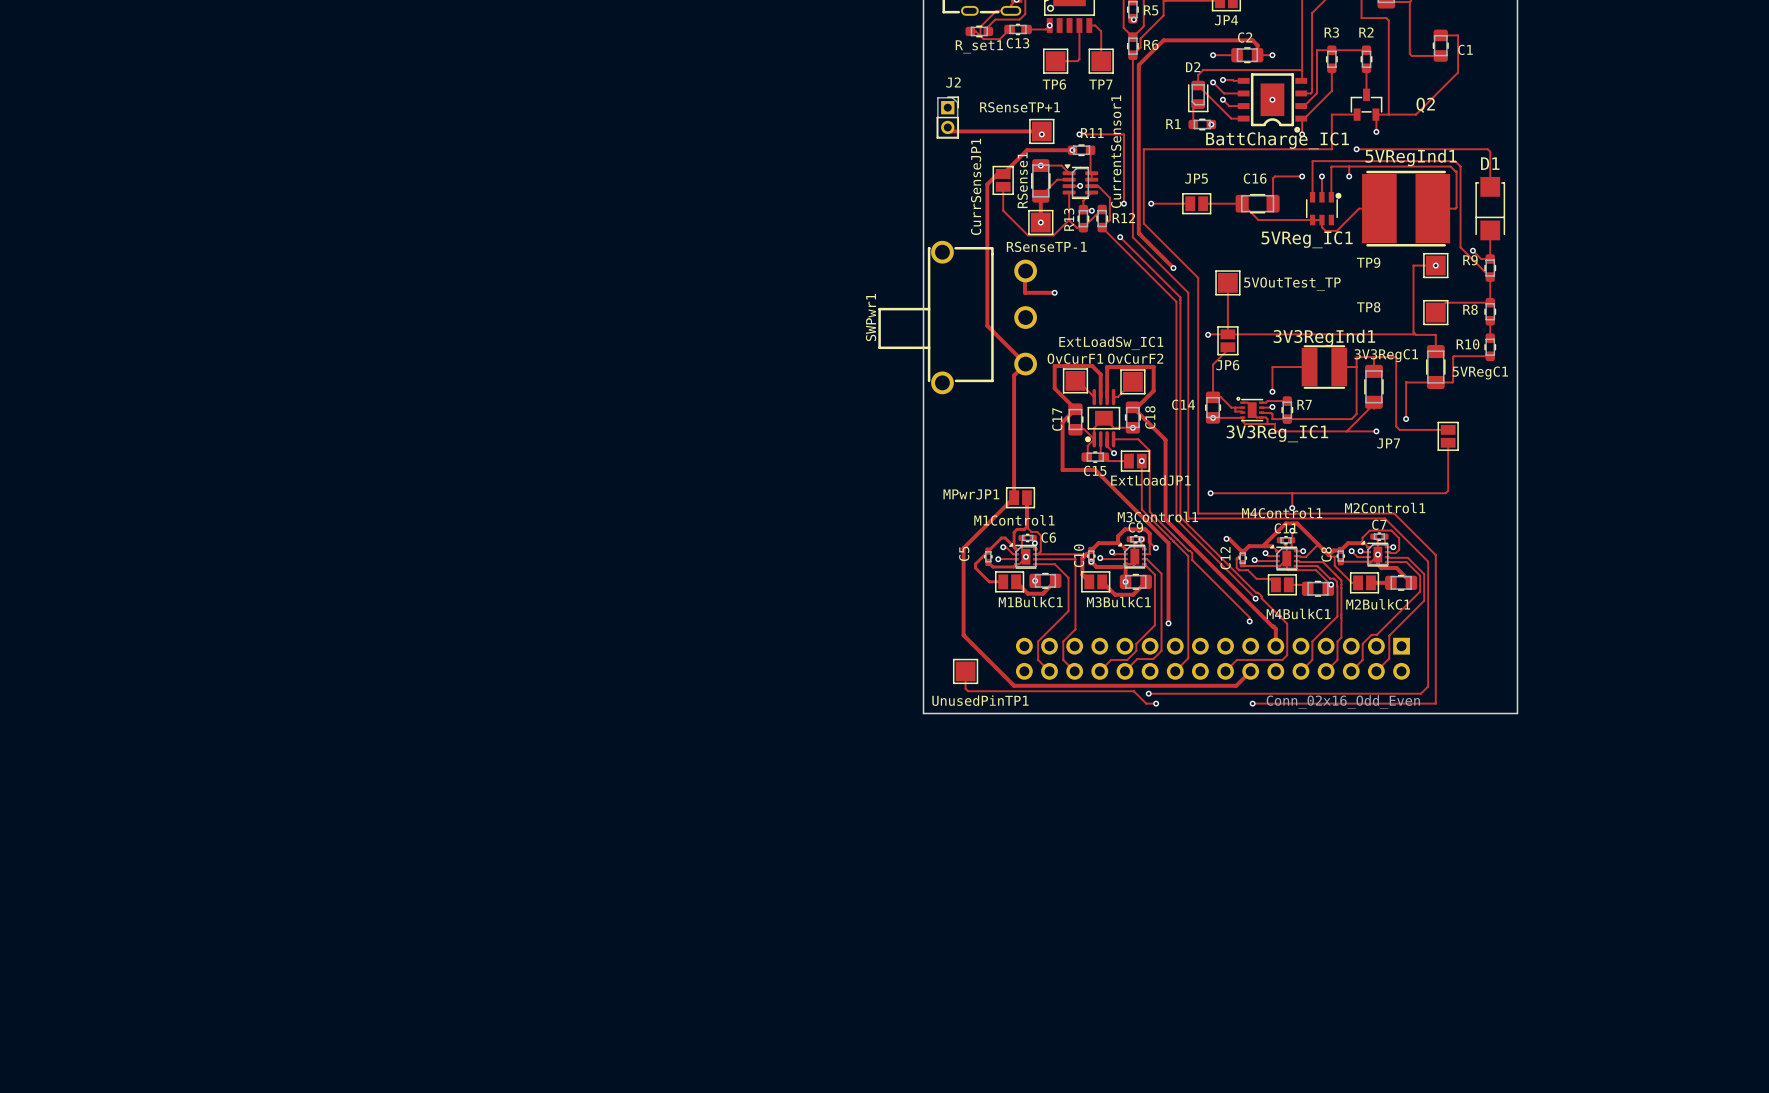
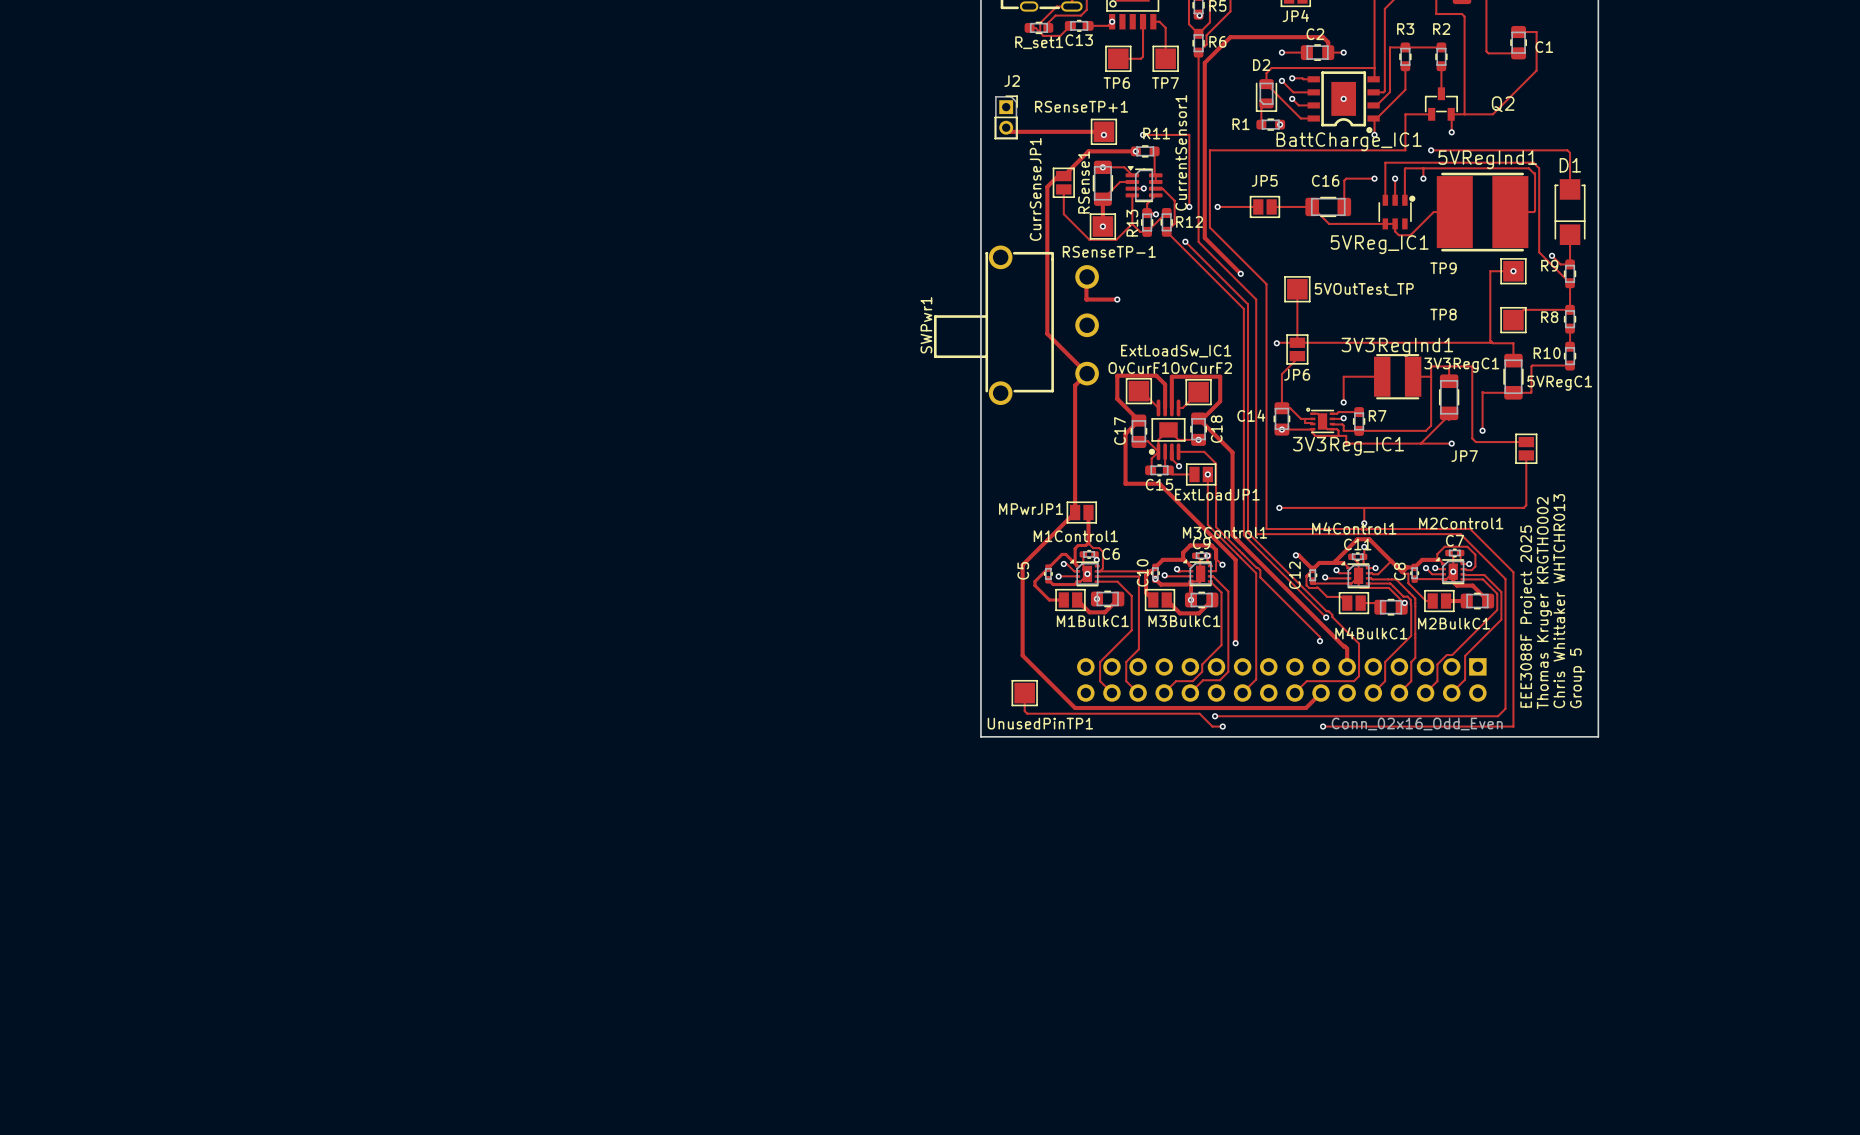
text: none -> Chris Whittaker WHTCHR013 (1559, 601)
text: none -> Thomas Kruger KRGTHO002 (1544, 603)
text: none -> EEE3088F Project 2025 (1527, 616)
text: none -> Group 5 (1577, 678)

